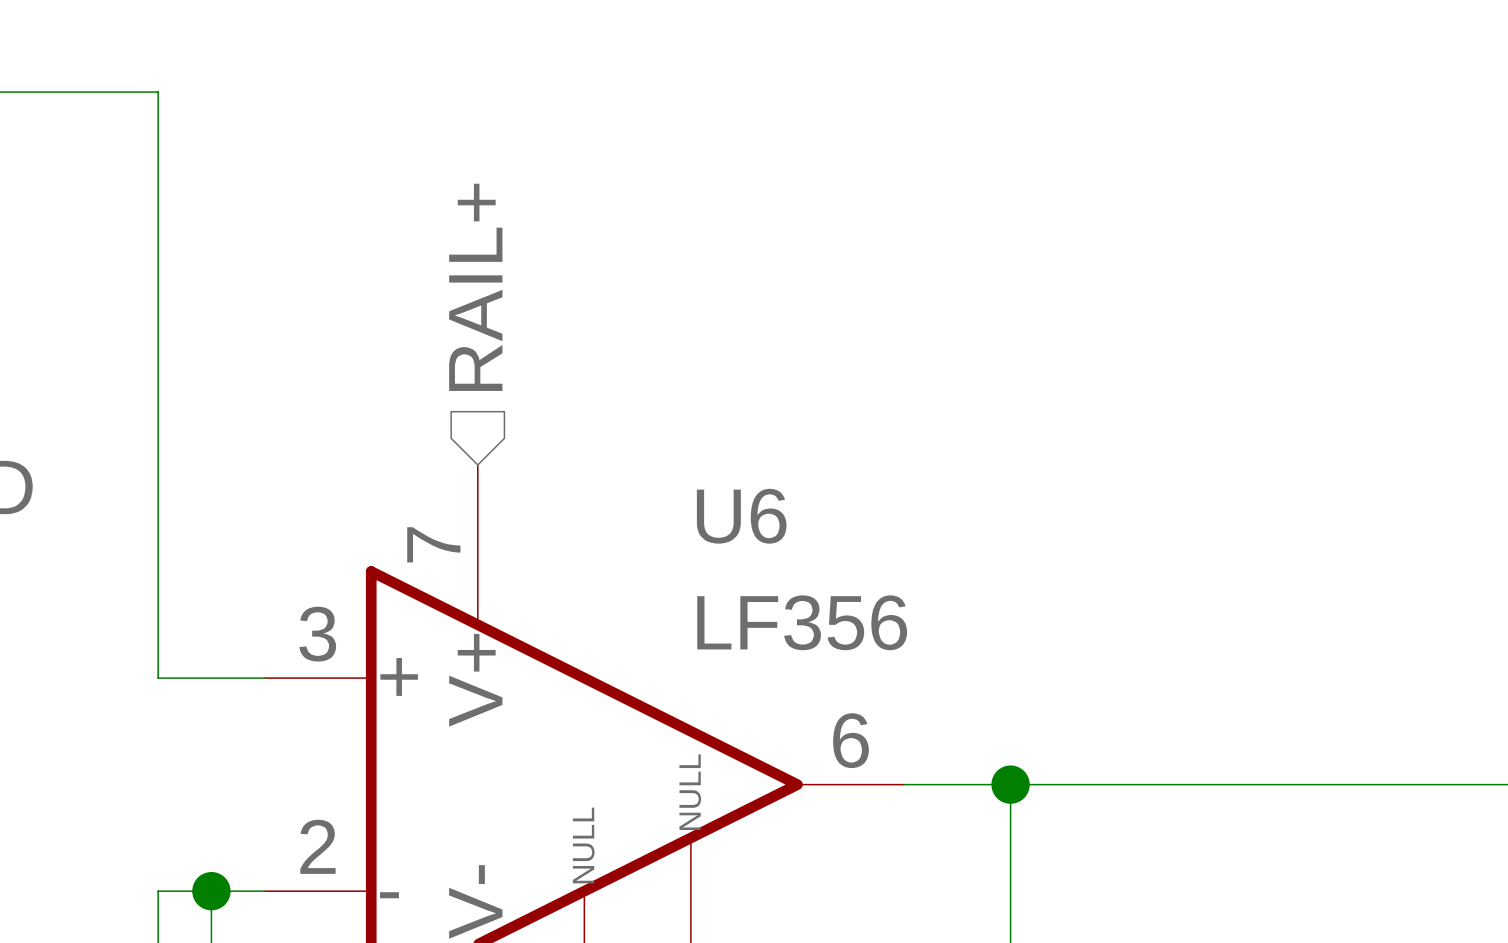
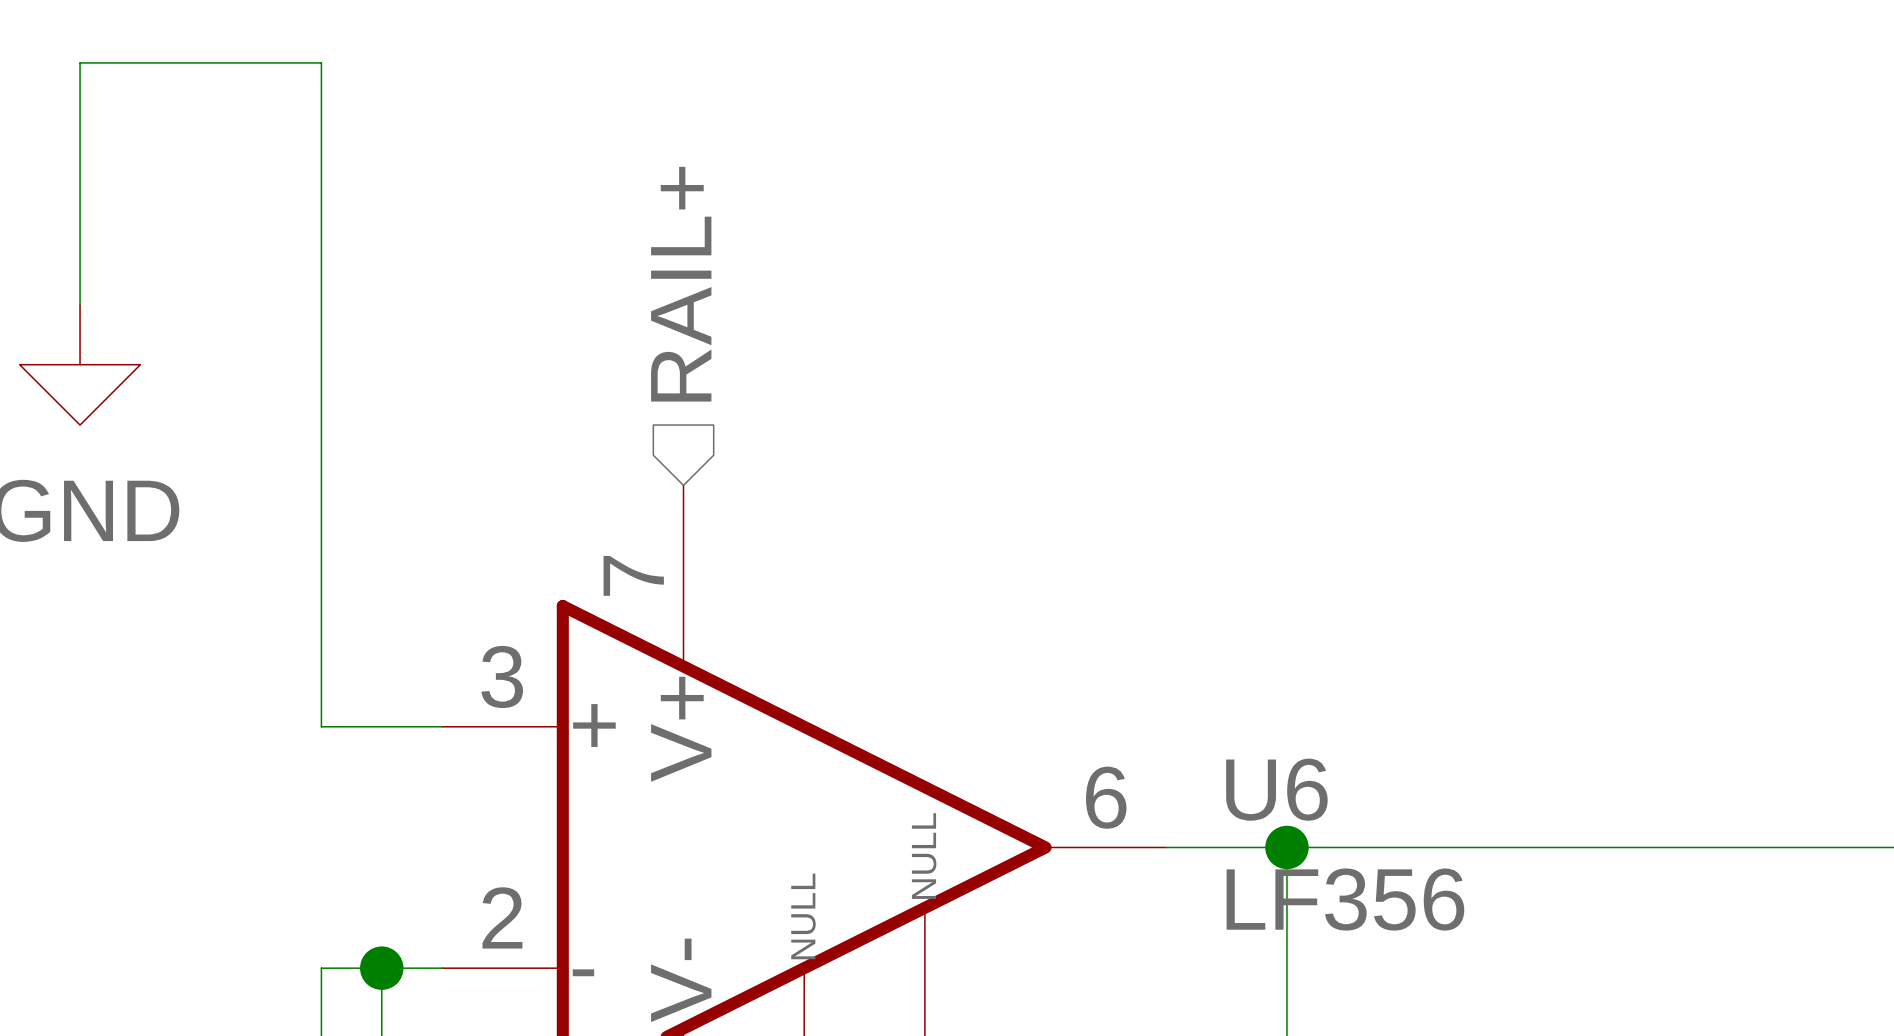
U6 name position: U6 (741, 516) -> U6 (1276, 789)
U6 value position: LF356 (802, 622) -> LF356 (1345, 899)

